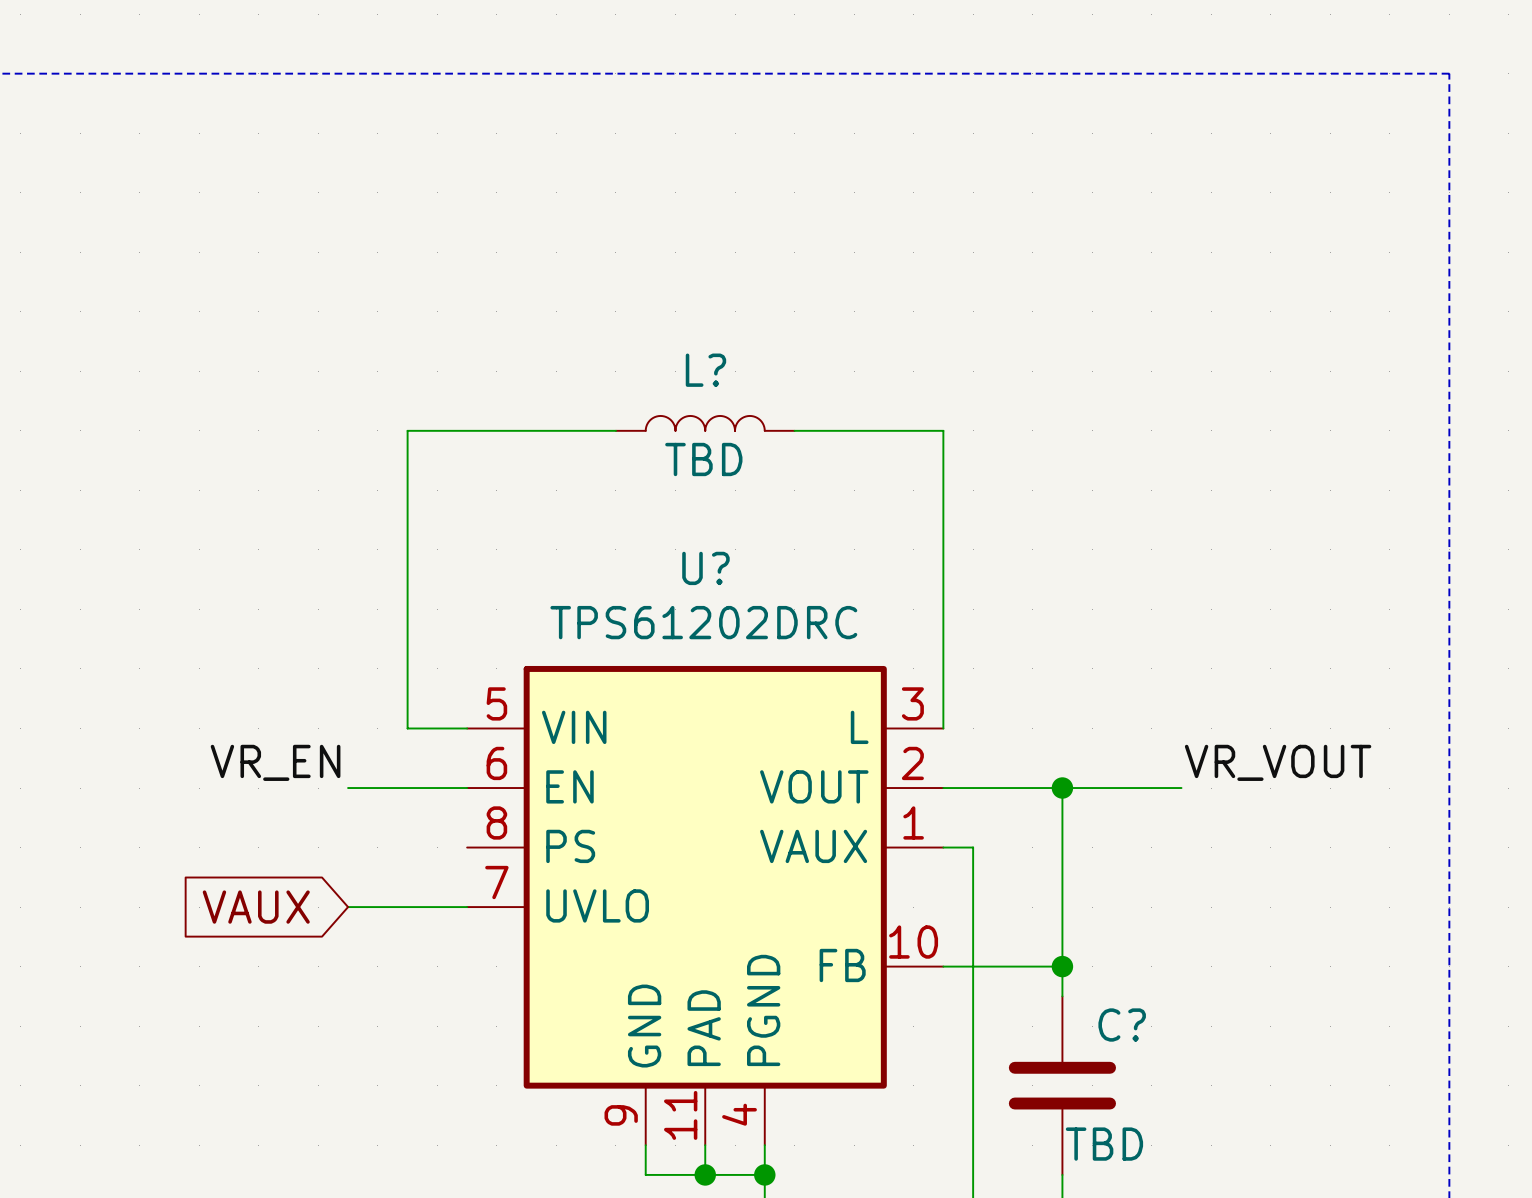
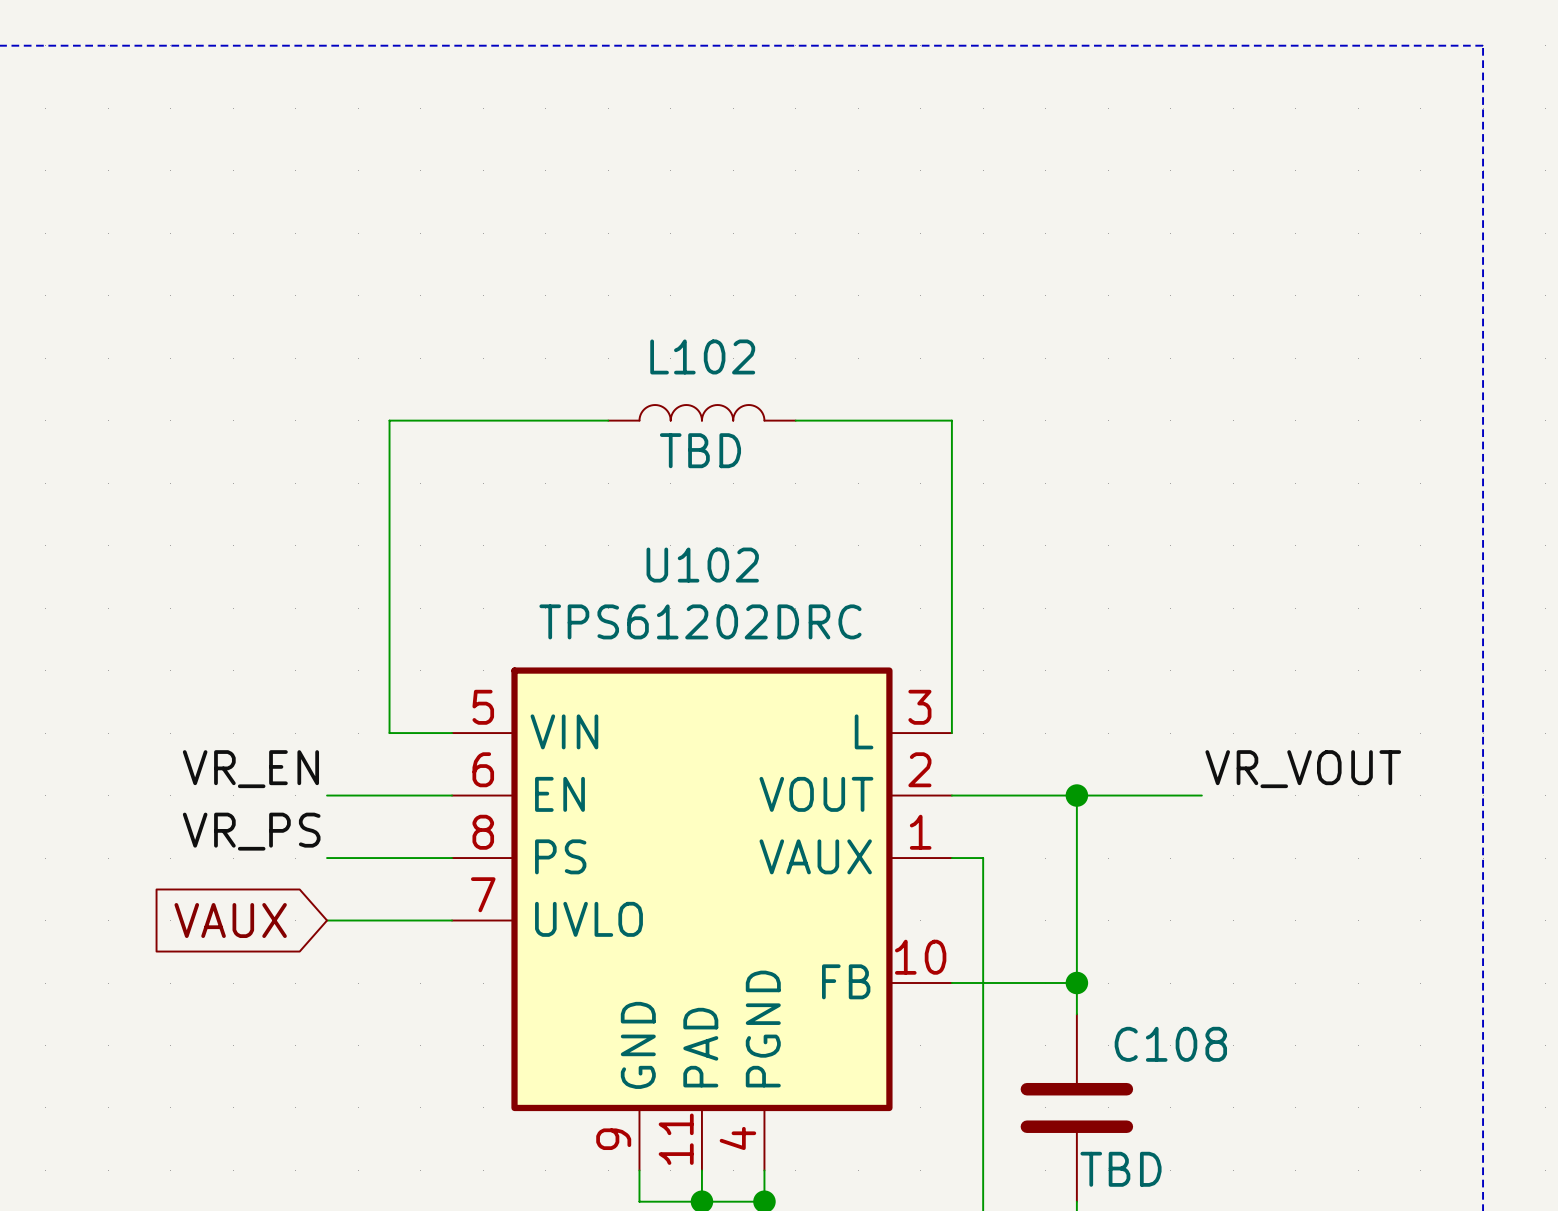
L? name: L? (705, 370) -> L102 (702, 356)
U? name: U? (705, 568) -> U102 (702, 565)
label: none -> VR_PS (251, 831)
wire: none -> (327, 858) (452, 858)
C? name: C? (1122, 1025) -> C108 (1170, 1044)

